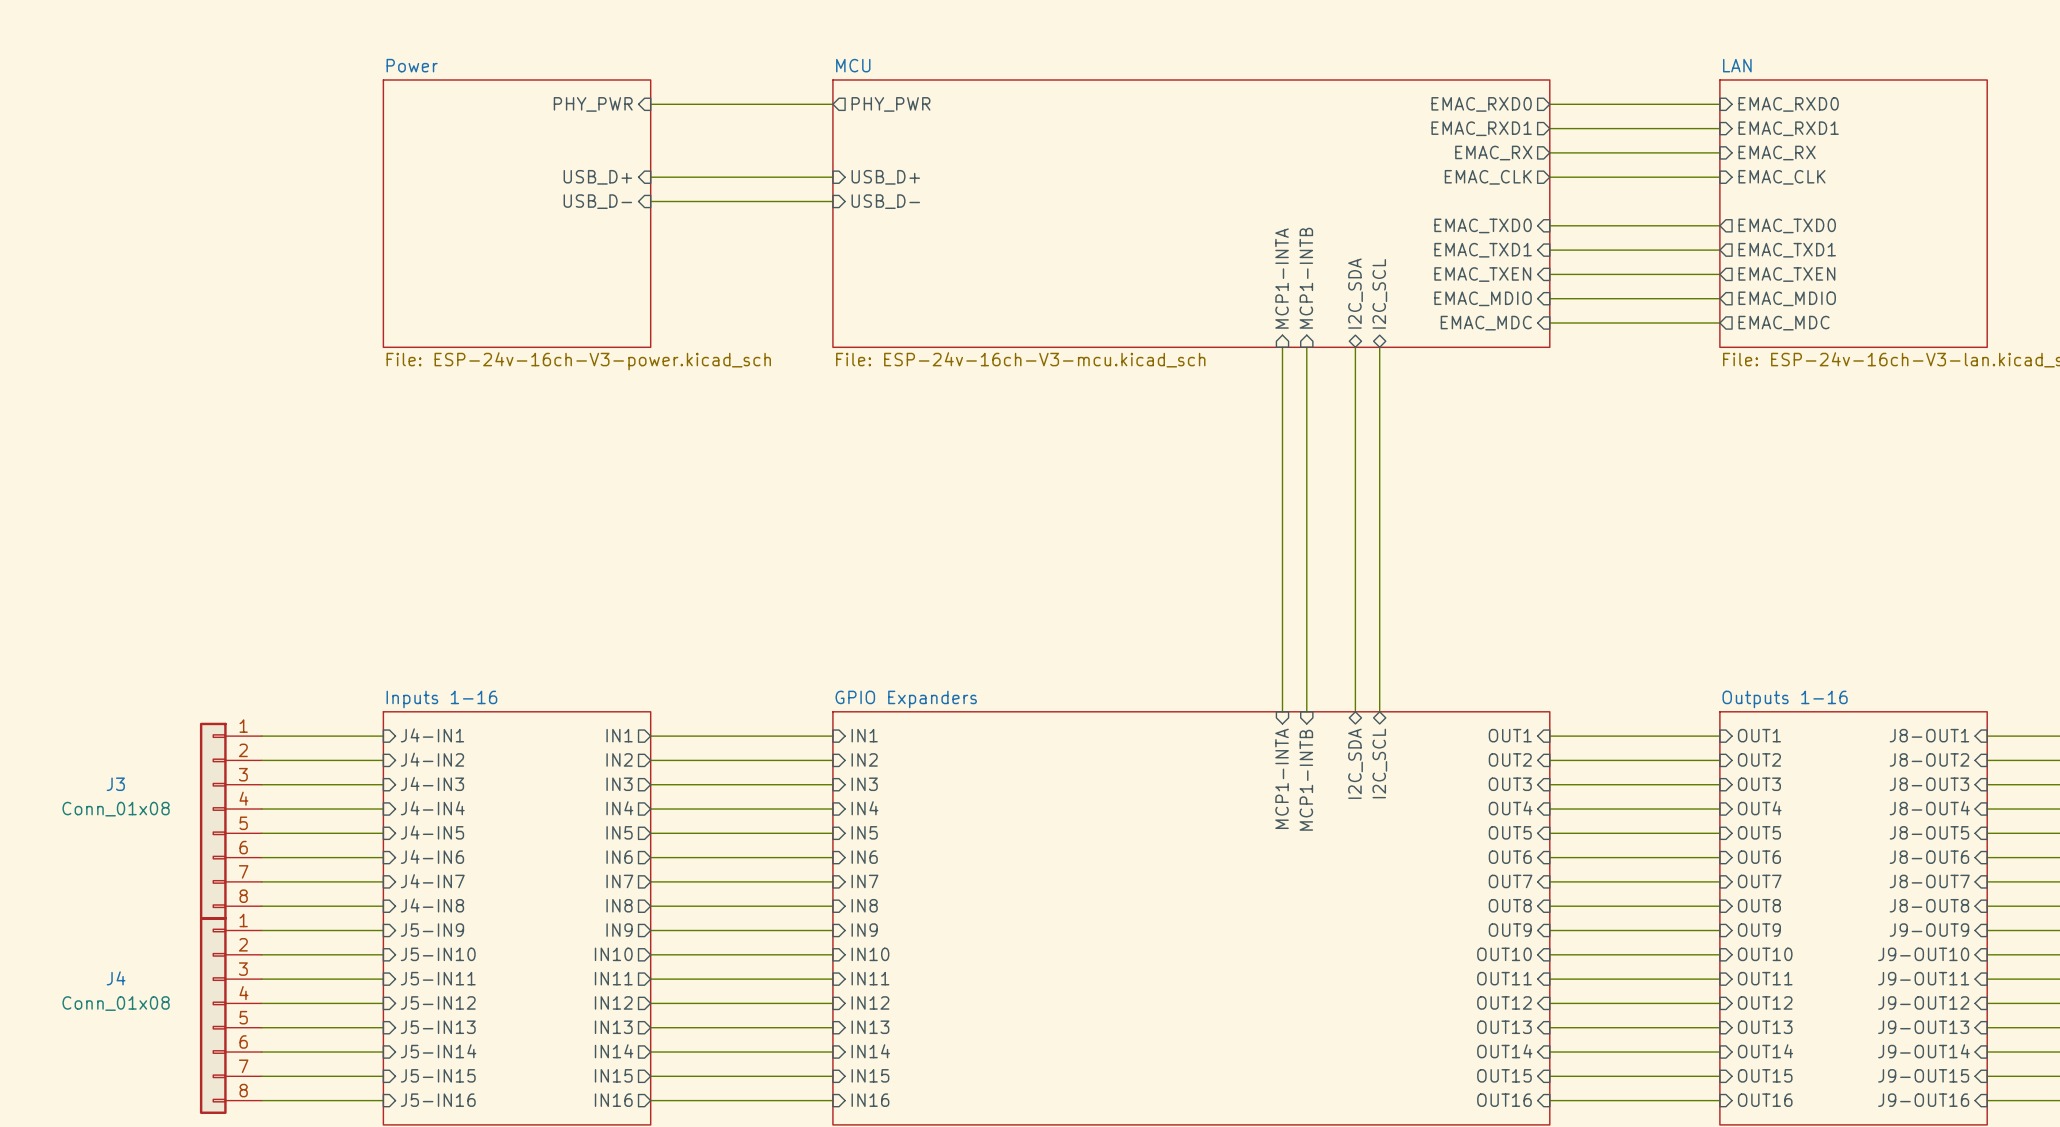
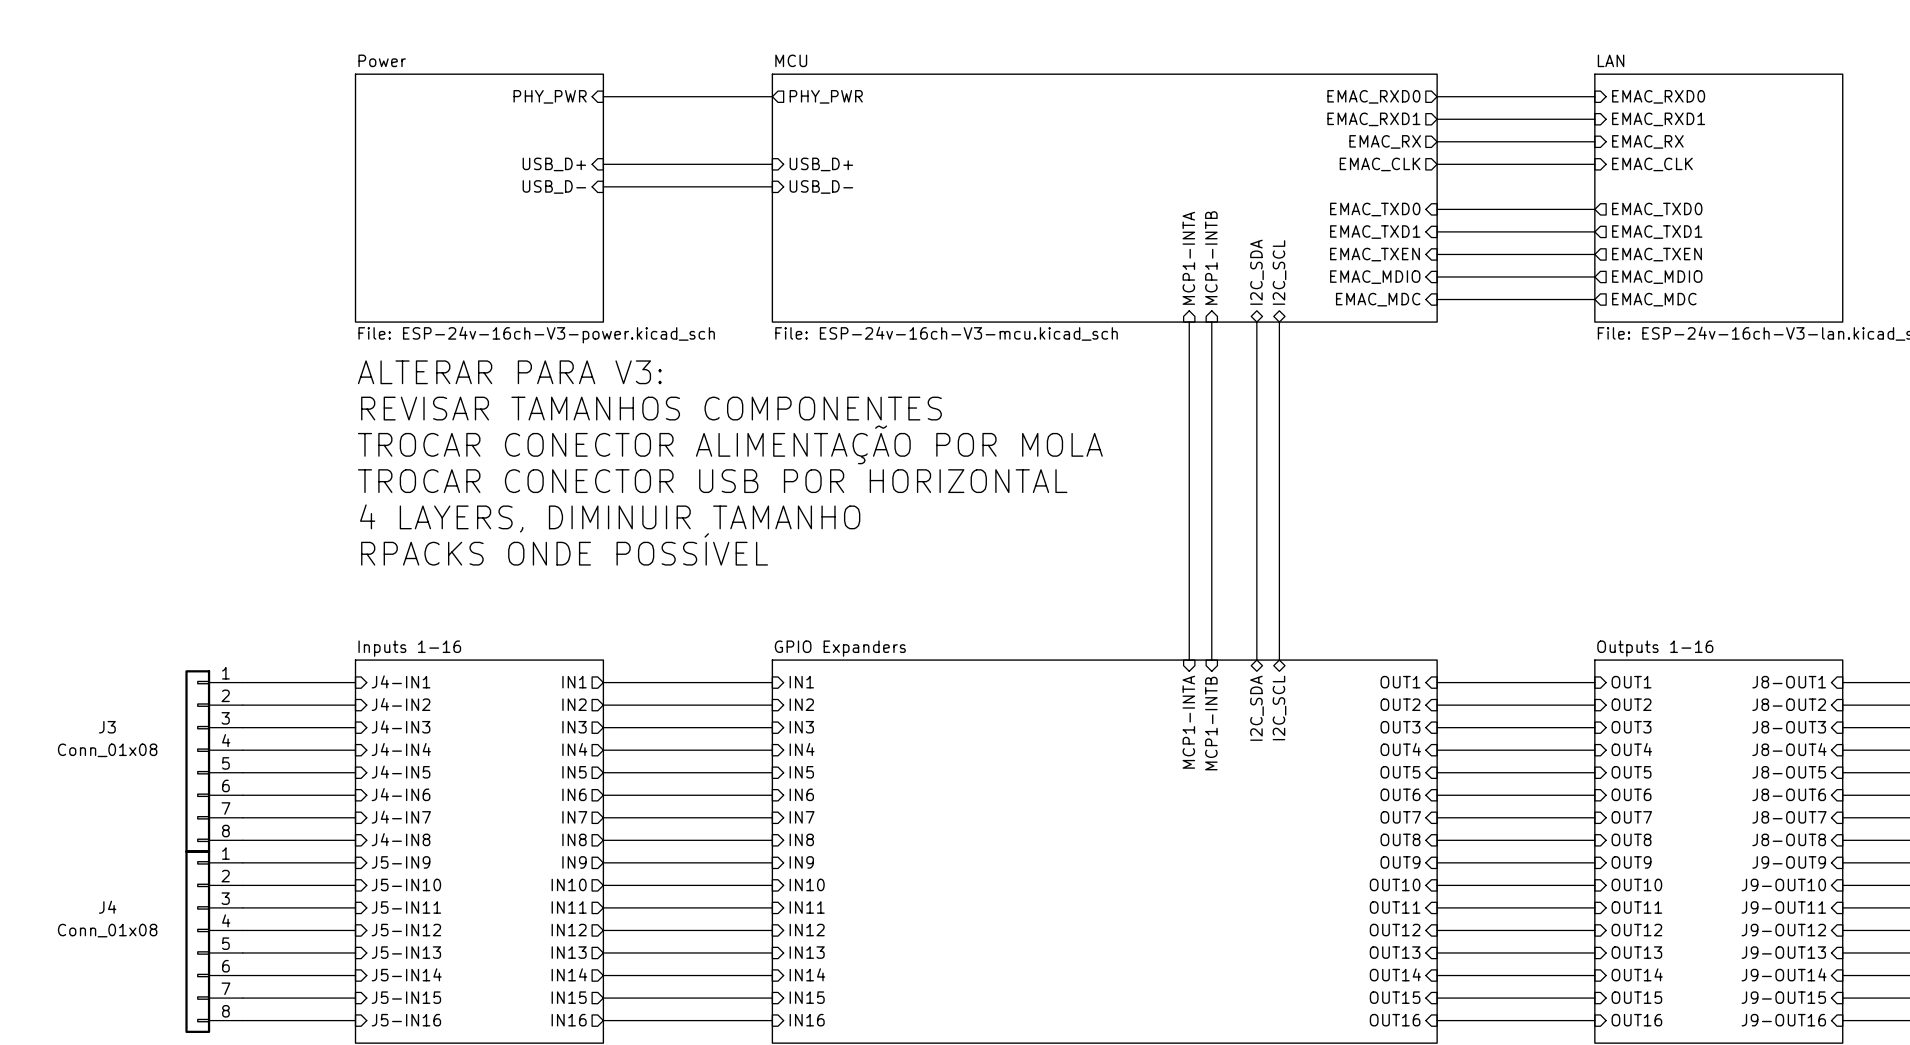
text: none -> ALTERAR PARA V3: (509, 372)
text: none -> REVISAR TAMANHOS COMPONENTES (651, 408)
text: none -> TROCAR CONECTOR ALIMENTAÇÃO POR MOLA (730, 444)
text: none -> TROCAR CONECTOR USB POR HORIZONTAL (712, 481)
text: none -> 4 LAYERS, DIMINUIR TAMANHO (610, 518)
text: none -> RPACKS ONDE POSSÍVEL (564, 549)

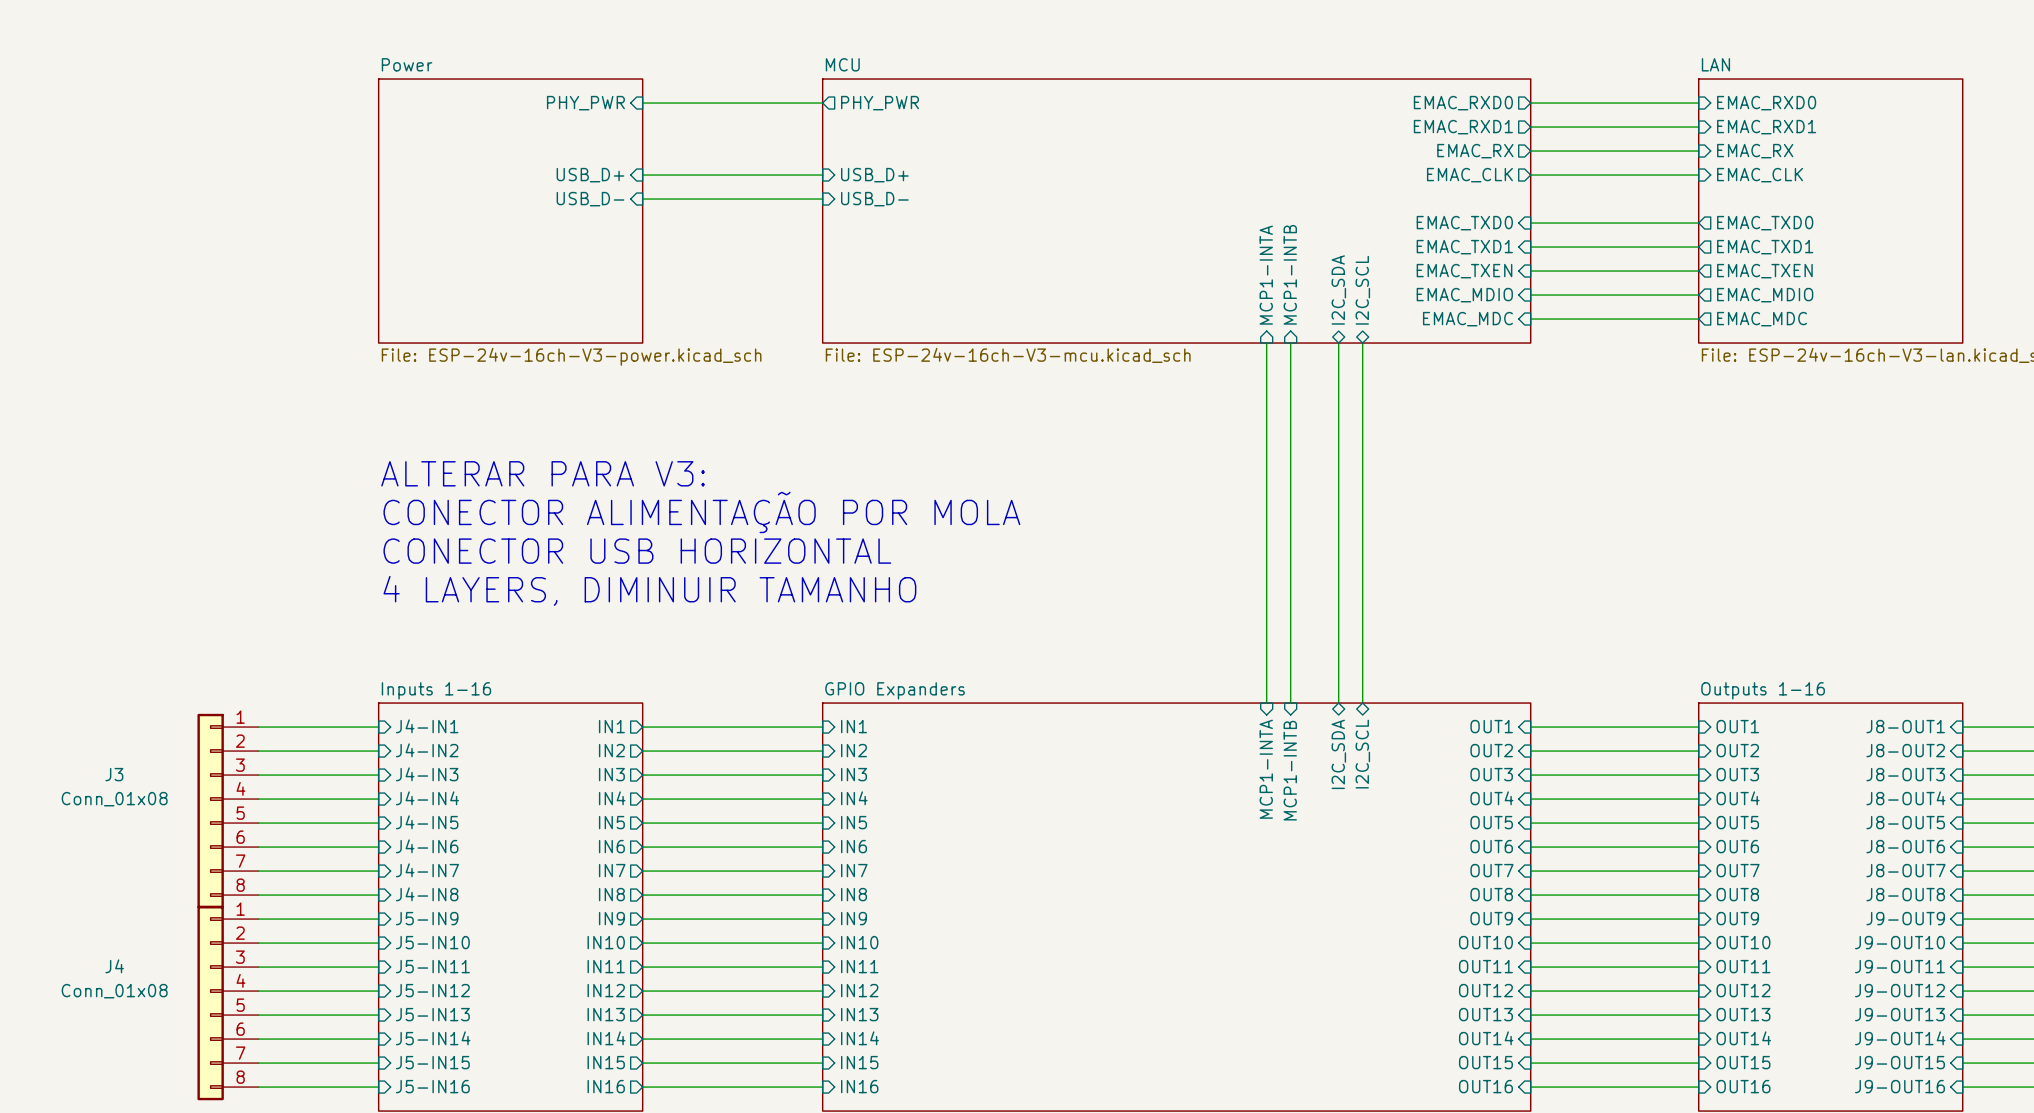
text: ALTERAR PARA V3: (509, 372) -> none
text: REVISAR TAMANHOS COMPONENTES (651, 408) -> none
text: TROCAR CONECTOR ALIMENTAÇÃO POR MOLA (730, 444) -> ALTERAR PARA V3: (543, 473)
text: TROCAR CONECTOR USB POR HORIZONTAL (712, 481) -> CONECTOR ALIMENTAÇÃO POR MOLA (701, 512)
text: 4 LAYERS, DIMINUIR TAMANHO (610, 518) -> CONECTOR USB HORIZONTAL (637, 551)
text: RPACKS ONDE POSSÍVEL (564, 549) -> 4 LAYERS, DIMINUIR TAMANHO (649, 590)

